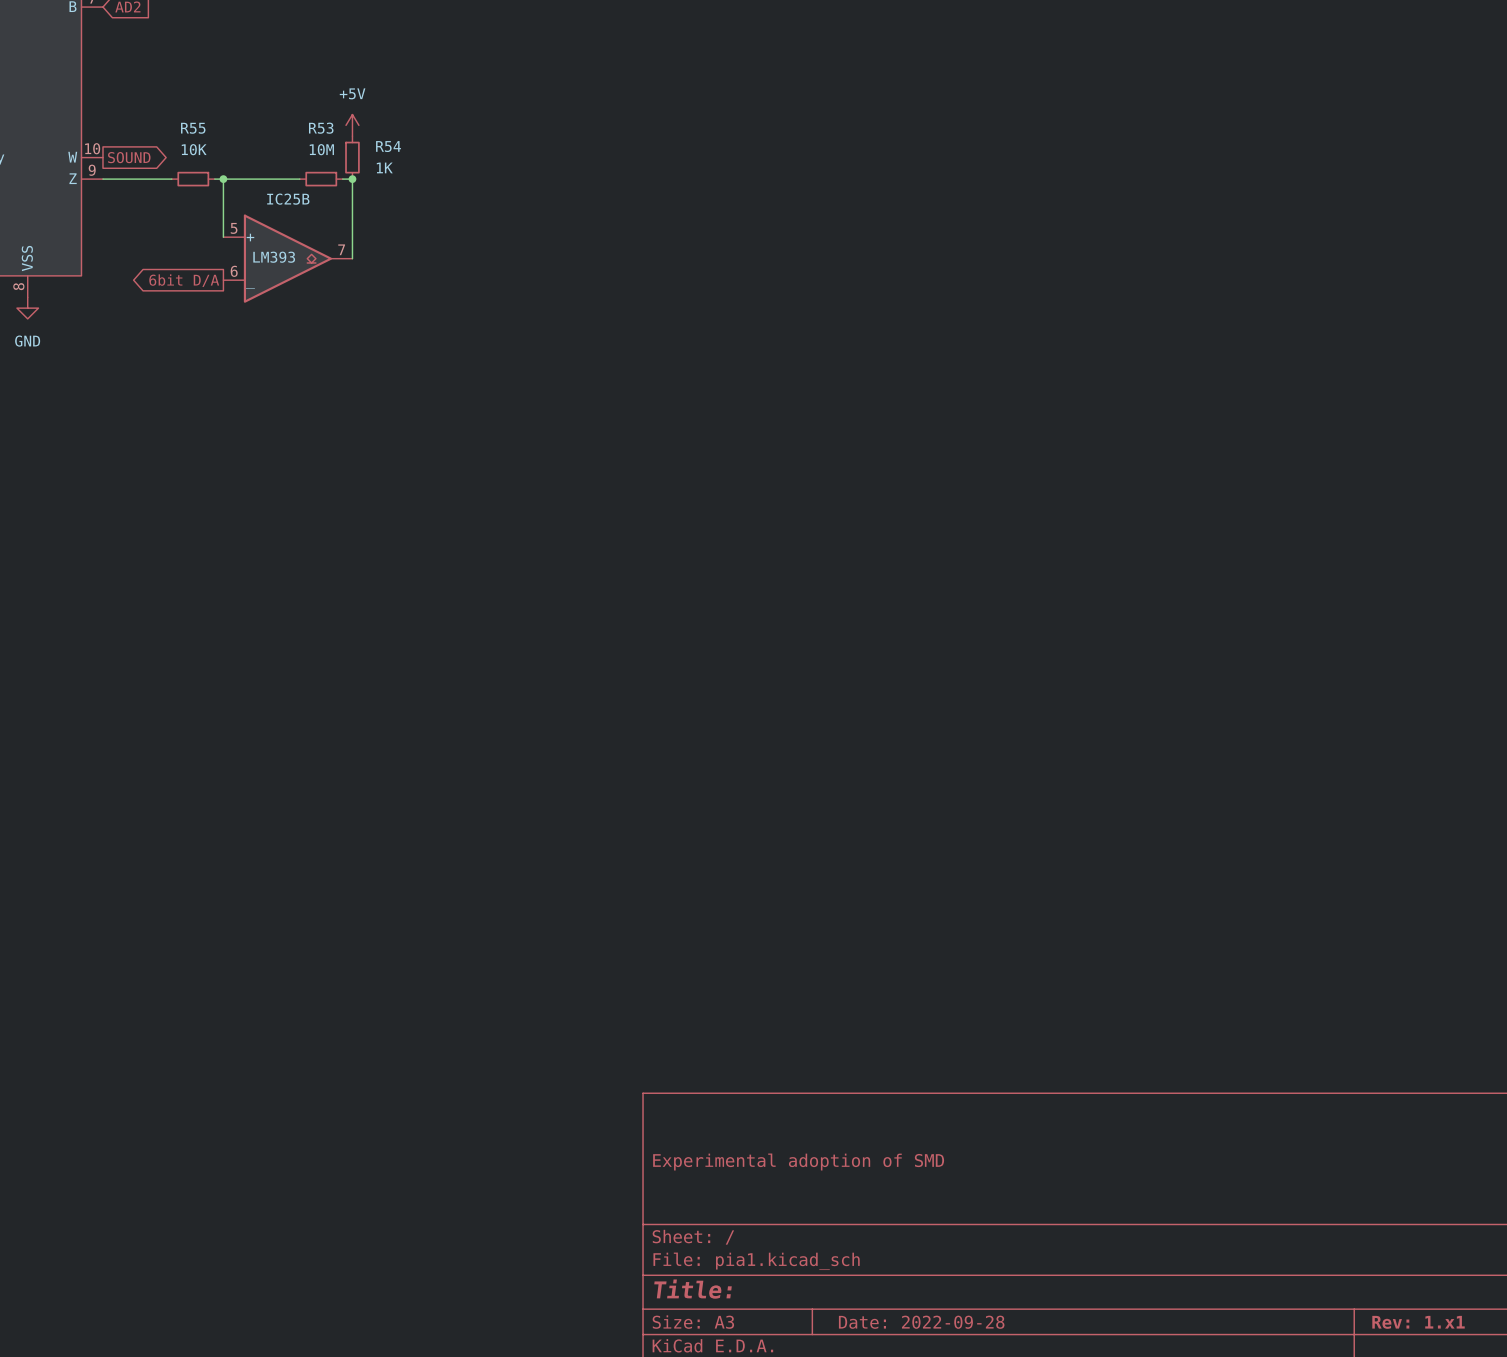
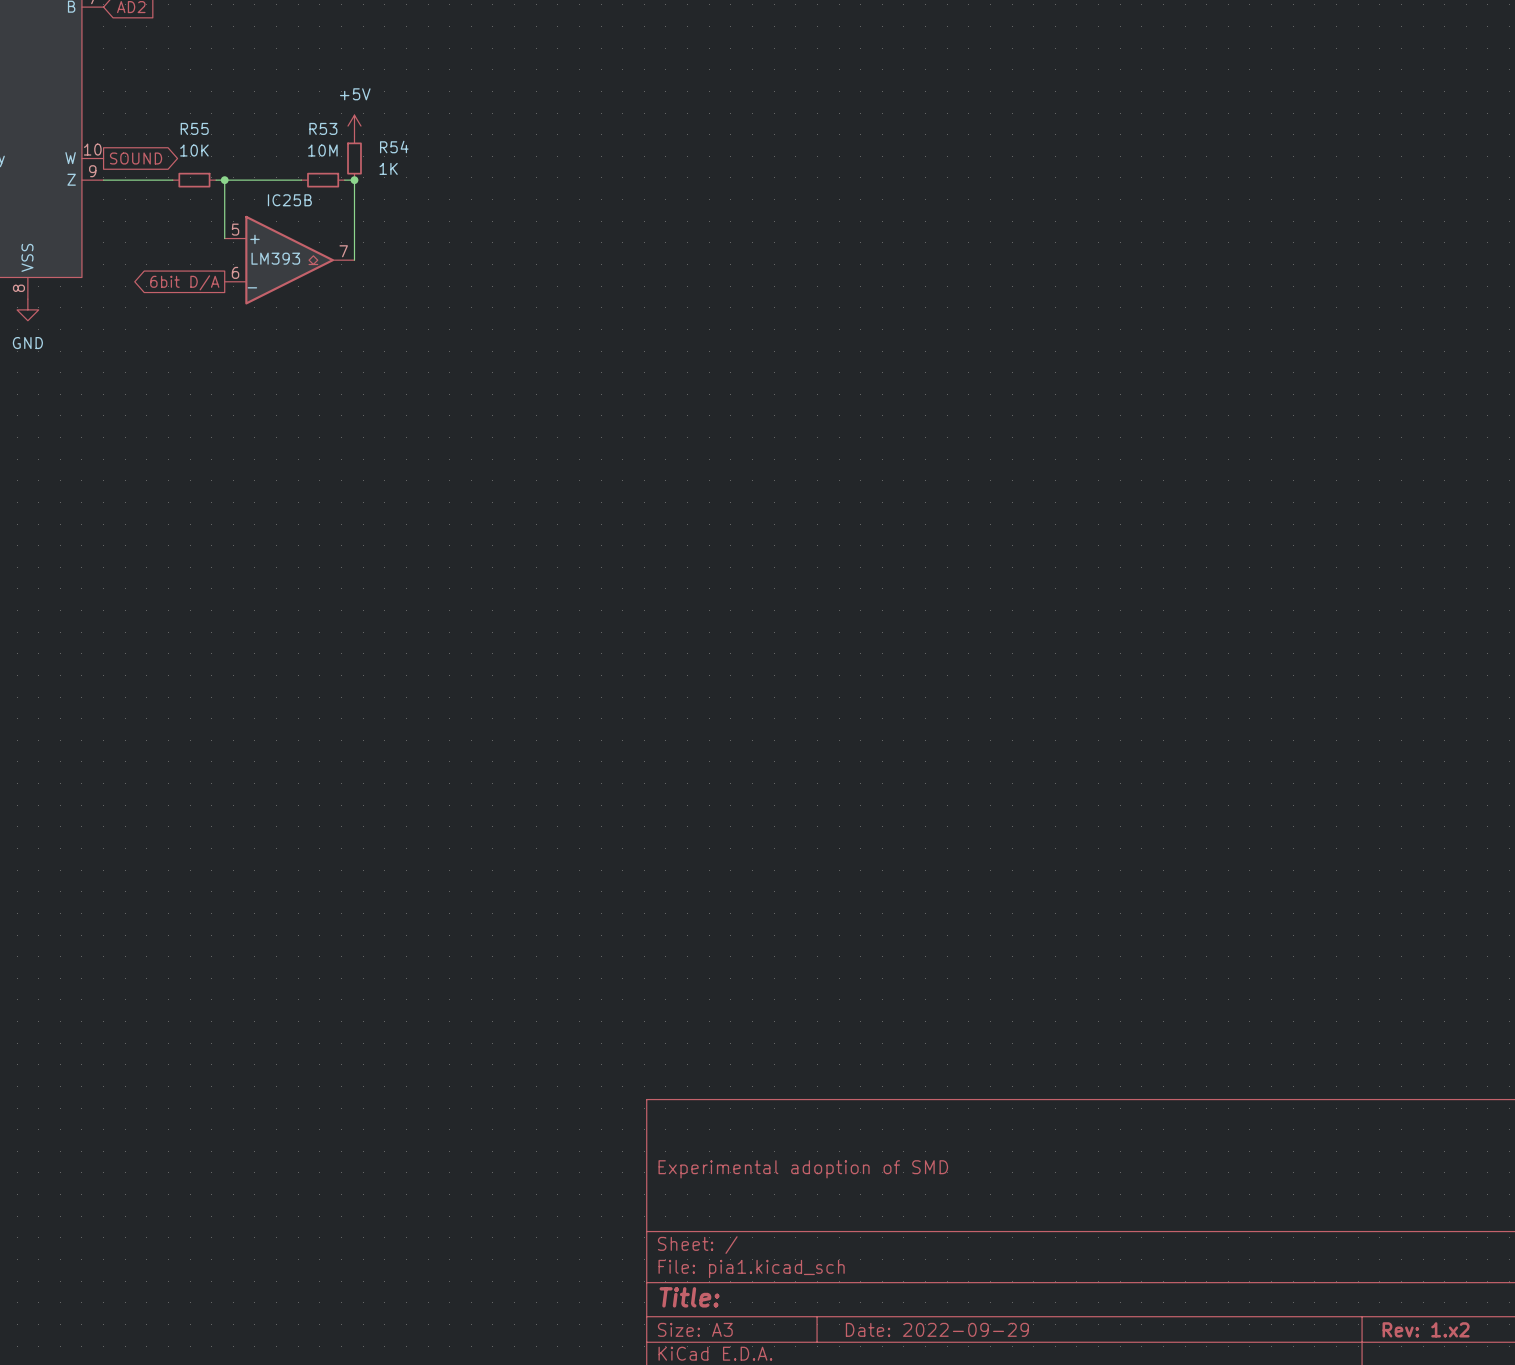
title block: Date: 2022-09-28 (921, 1322) -> Date: 2022-09-29 (937, 1329)
title block: Rev: 1.x1 (1418, 1322) -> Rev: 1.x2 (1426, 1329)

